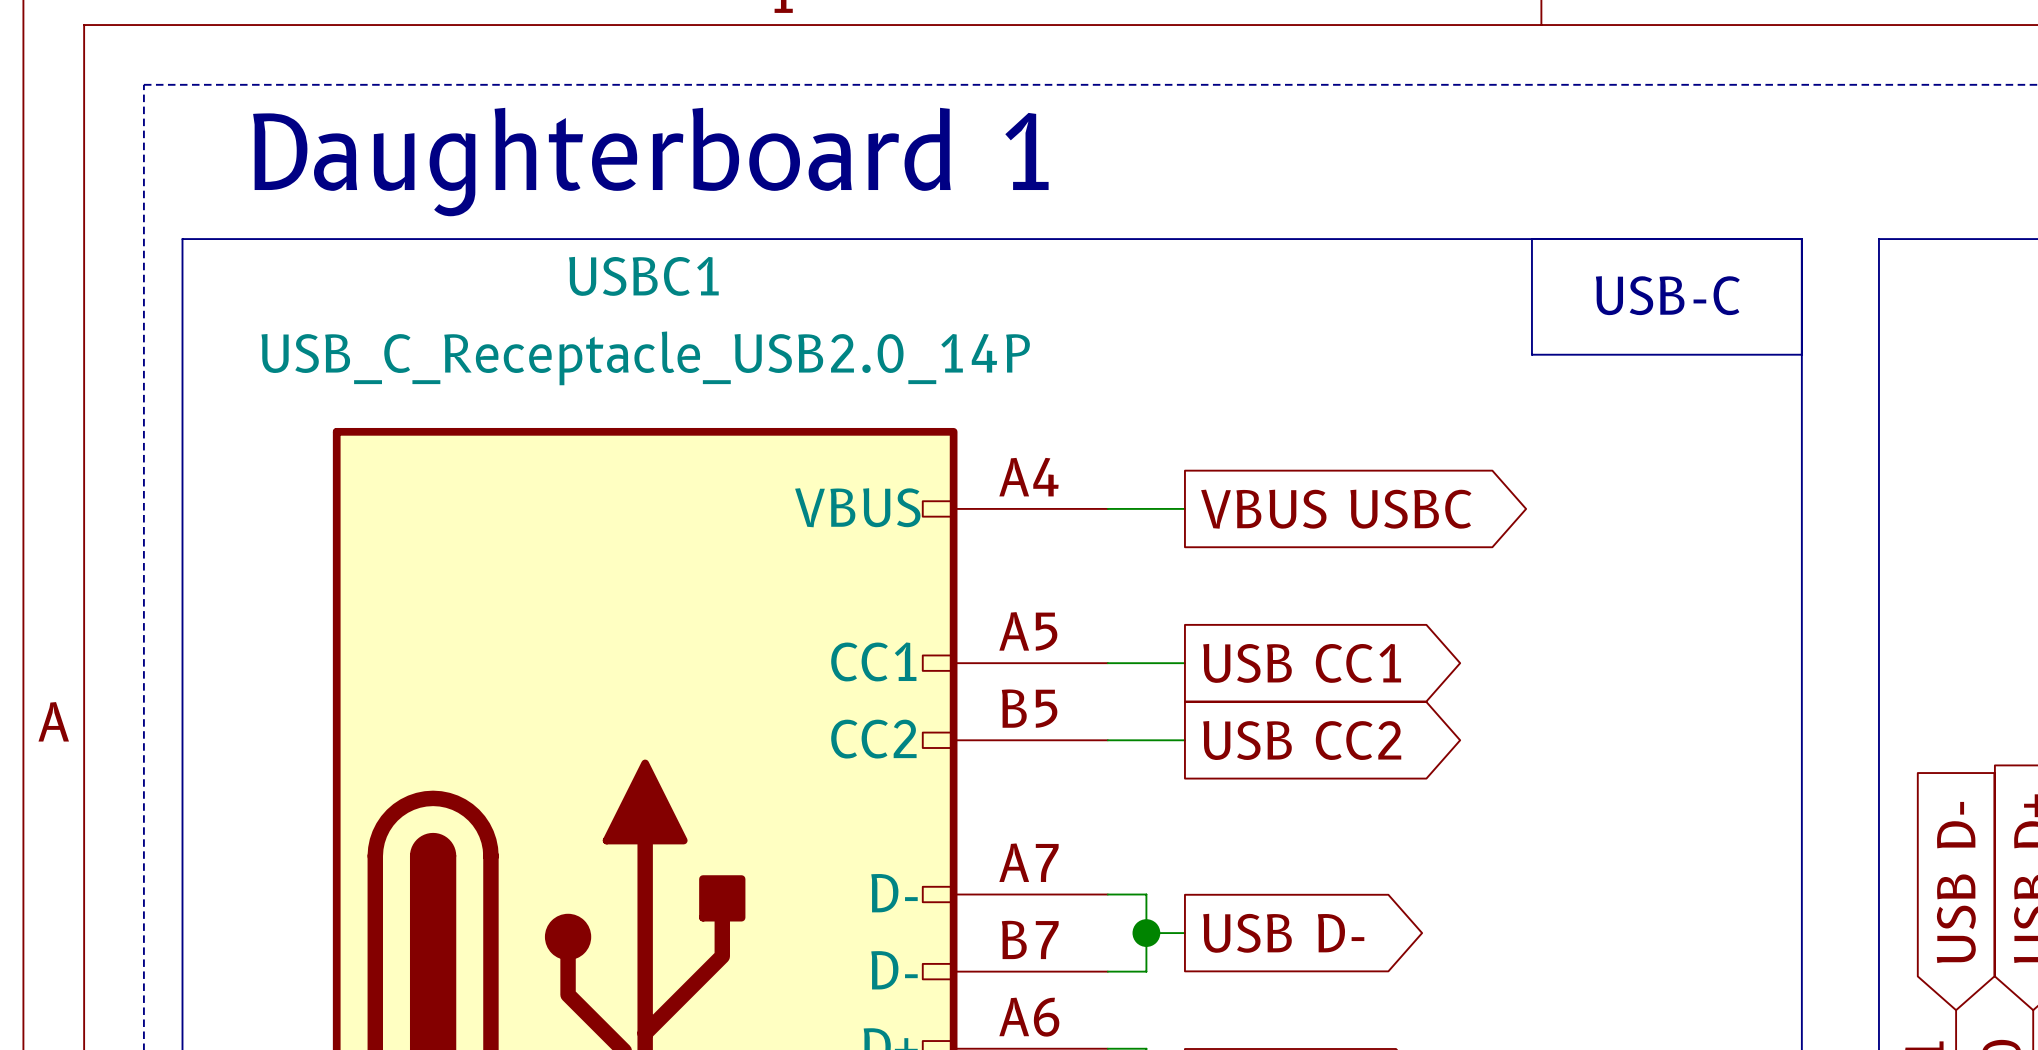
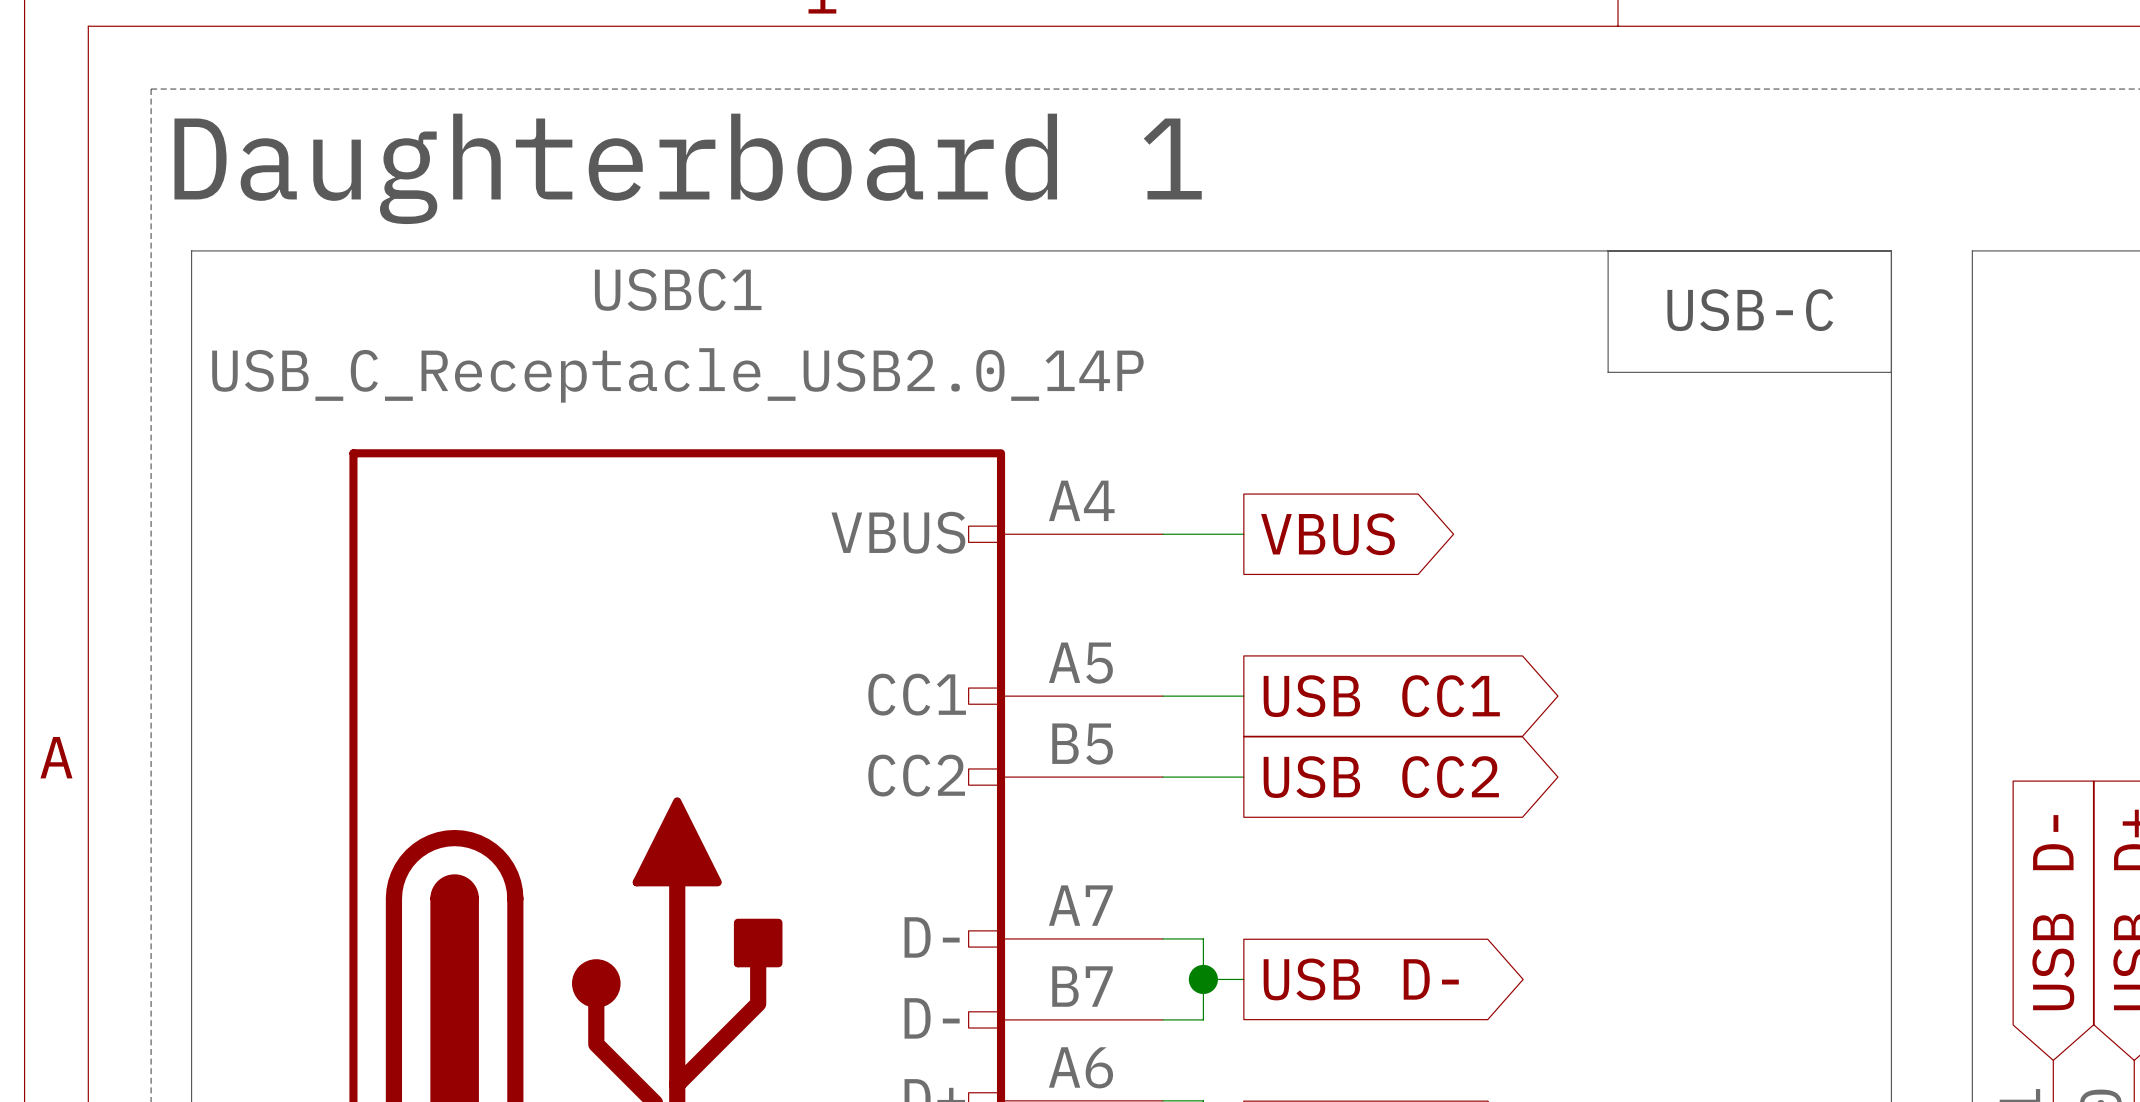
global label: VBUS USBC (1336, 509) -> VBUS (1327, 534)

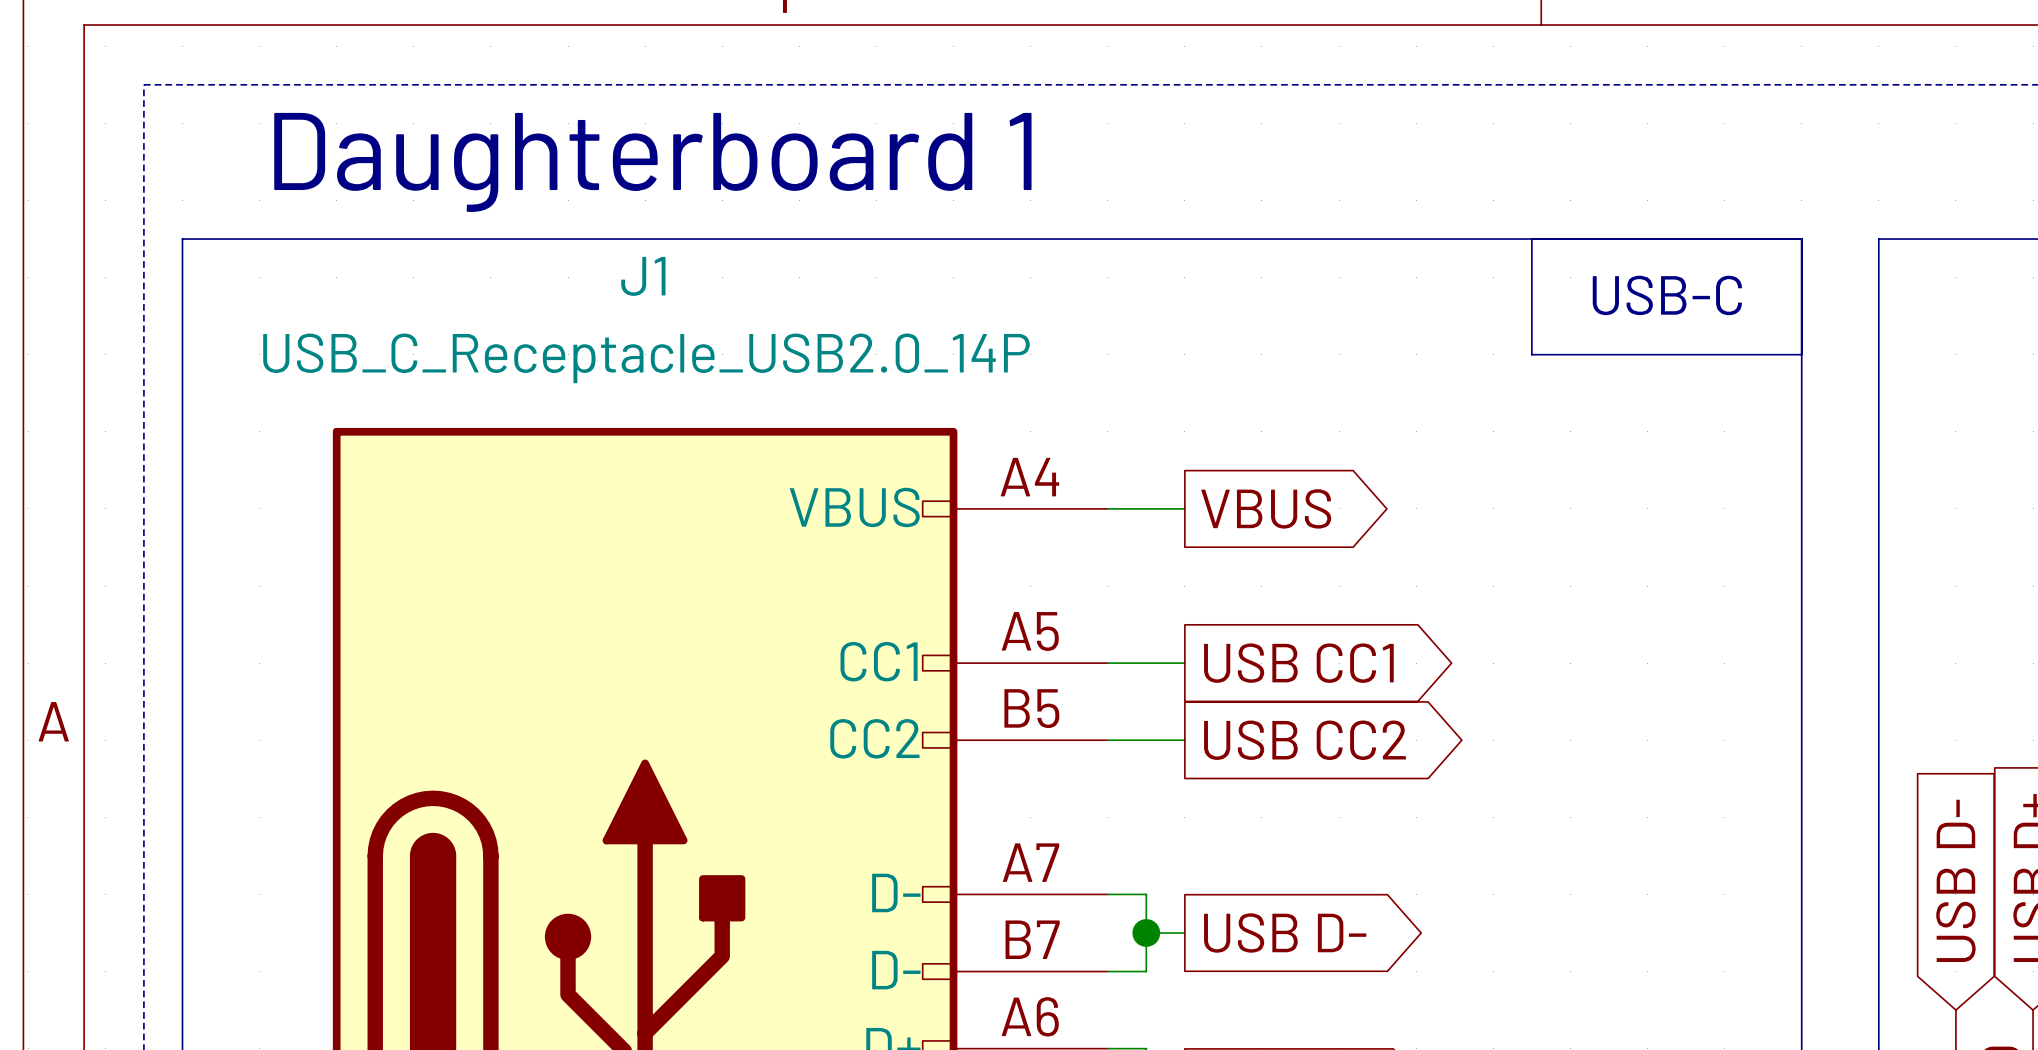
USBC1 name: USBC1 (678, 289) -> J1 (643, 276)

